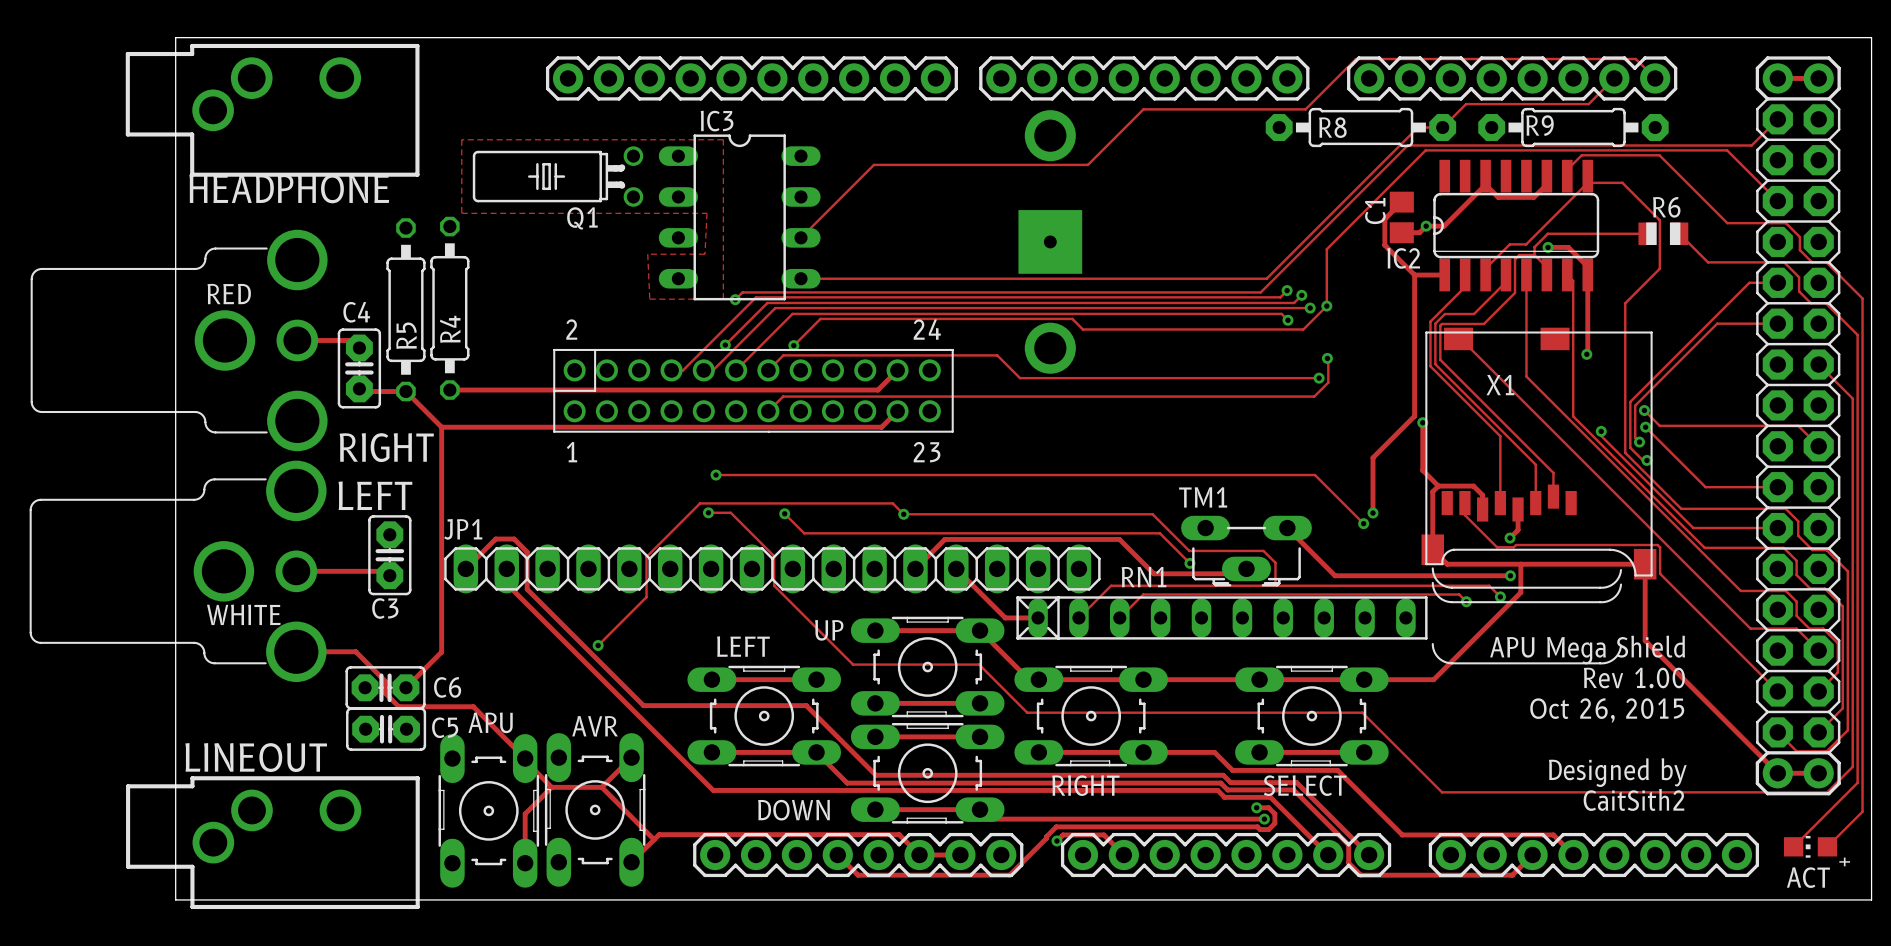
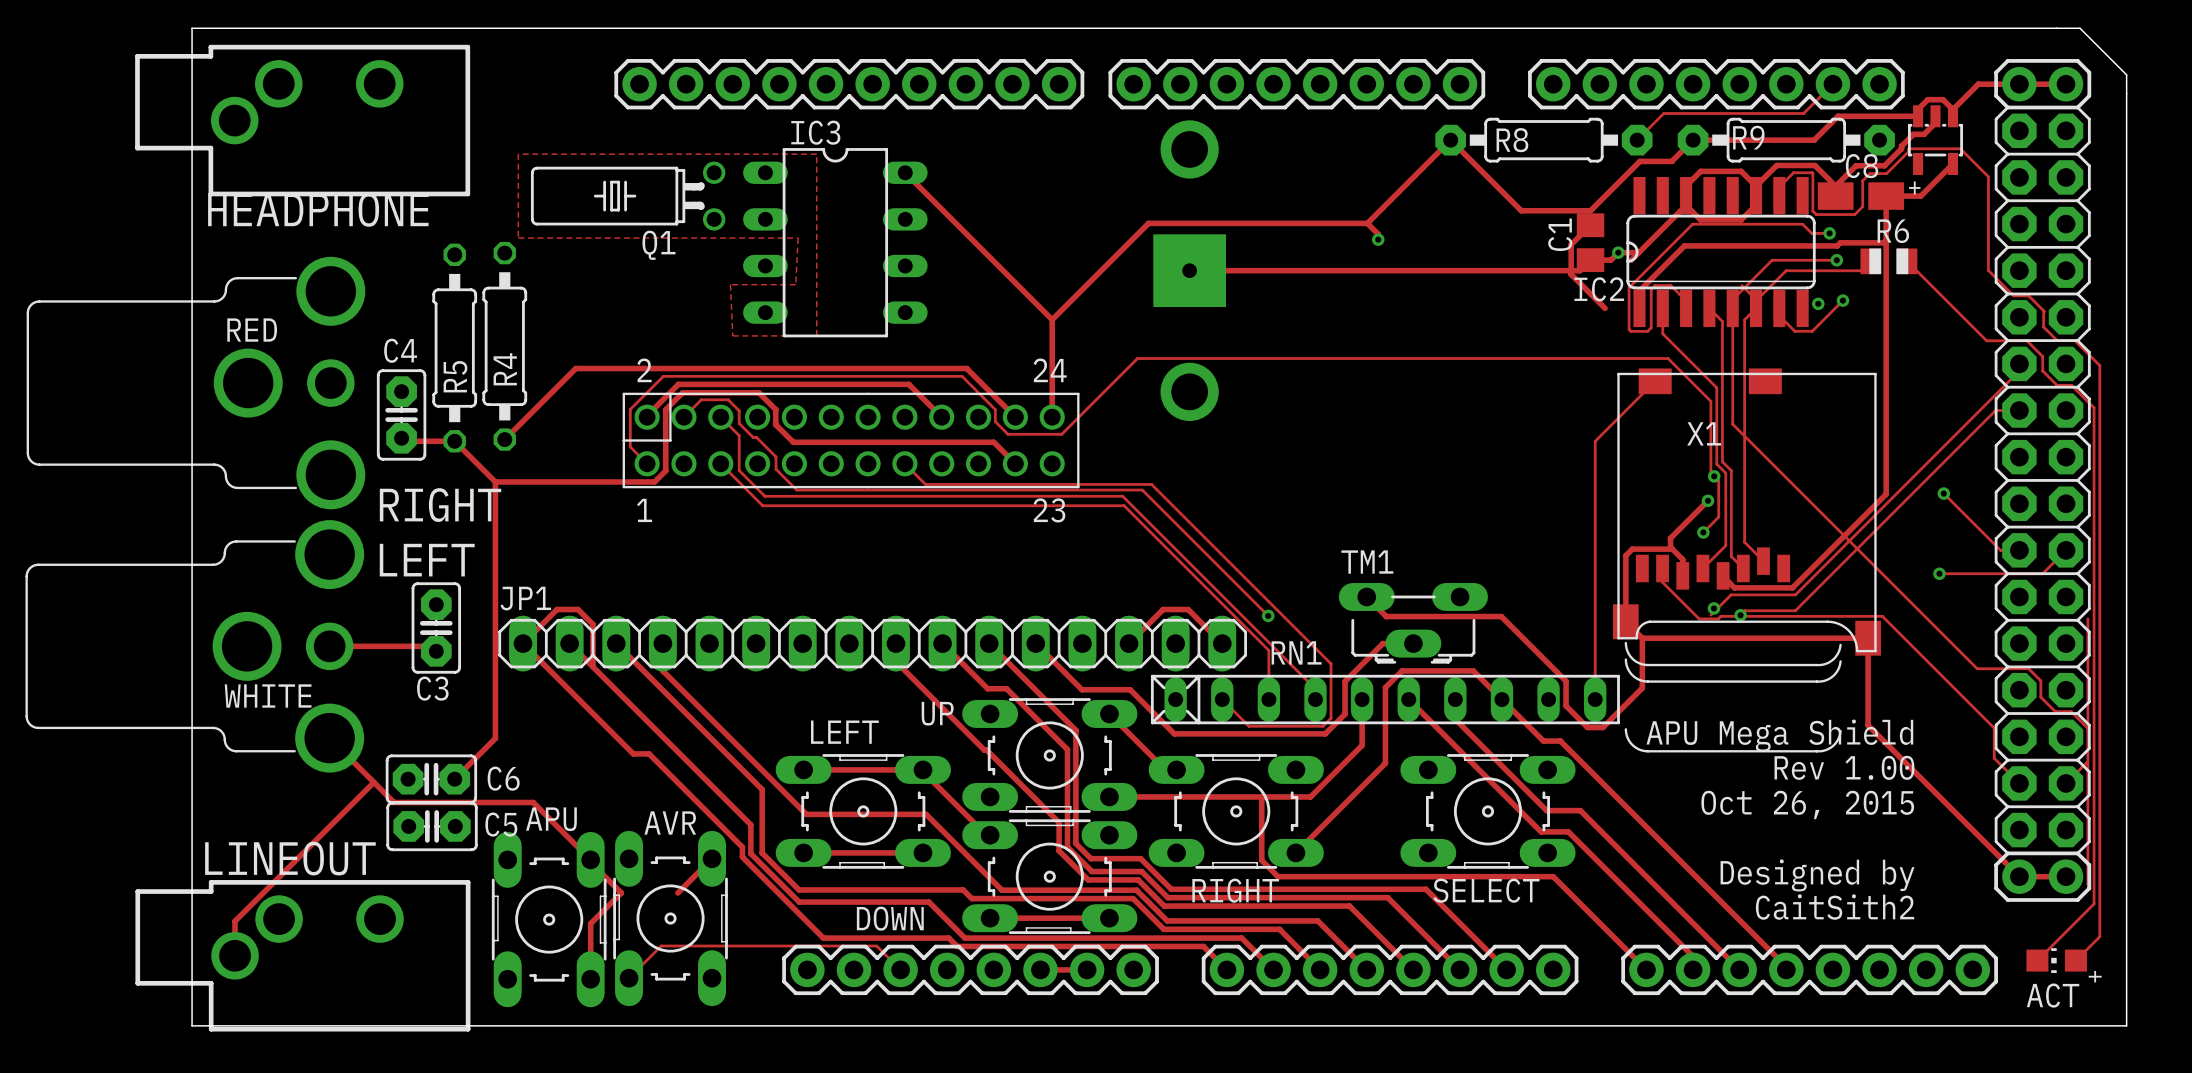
board edge: (175, 37) (1871, 37) (1871, 899) (175, 899) -> (192, 37) (192, 28) (2080, 28) (2126, 74) (2126, 1025) (192, 1025) (192, 1021)
track: (1655, 78) (1635, 59) (1355, 59) (1305, 109) (1143, 109) (1087, 164) (873, 164) (801, 237) -> none
track: none -> (2019, 84) (1978, 84) (1952, 109)
track: none -> (1952, 109) (1942, 99) (1927, 99) (1918, 109) (1918, 116) (1838, 116) (1814, 140) (1693, 140) (1671, 161) (1639, 161) (1590, 210) (1521, 210) (1450, 140) (1367, 223)
track: none -> (1935, 116) (1935, 122) (1924, 134) (1913, 134) (1884, 165) (1856, 165) (1835, 186)
track: (1777, 119) (1751, 145) (1407, 145) (1260, 292) (742, 292) (735, 299) -> none
track: (1442, 127) (1417, 127) (1266, 278) (801, 278) -> none
part: none -> (1935, 140)
track: none -> (1952, 164) (1920, 196) (1886, 196) (1886, 240) (1884, 242)
track: none -> (905, 172) (1052, 319)
track: none -> (1835, 186) (1814, 165) (1776, 165) (1756, 186) (1741, 171) (1700, 171) (1686, 185) (1686, 195)
track: (1567, 169) (1581, 155) (1659, 155) (1727, 223) (1785, 223) (1799, 237) (1799, 250) (1812, 262) (1826, 262) (1862, 298) (1862, 811) (1848, 825) -> none
C8: none -> (1860, 196)
track: none -> (1367, 223) (1148, 223) (1052, 319)
track: none -> (1367, 223) (1378, 234) (1378, 239)
track: (1777, 201) (1727, 150) (1425, 150) (1326, 249) (1326, 306) (1303, 329) (1082, 329) (1072, 318) (820, 318) (793, 345) -> none
via: none -> (1829, 233)
via: none -> (1378, 239)
track: none -> (1590, 260) (1580, 270) (1189, 270)
track: none -> (1836, 260) (1772, 260) (1732, 299) (1732, 308)
via: none -> (1836, 260)
track: (1647, 233) (1547, 233) (1534, 247) (1534, 255) (1519, 255) (1515, 259) (1515, 292) (1483, 323) (1441, 323) (1440, 325) (1440, 359) (1553, 472) (1553, 496) -> (1756, 308) (1744, 319) (1744, 542) (1763, 561)
track: none -> (1870, 261) (1861, 270) (1786, 270) (1756, 300)
track: (1548, 247) (1568, 247) (1587, 266) (1586, 354) -> none
via: (1548, 247) -> none
track: (1708, 262) (1784, 262) (1785, 264) -> (1779, 188) (1793, 172) (1812, 172) (1812, 211) (1816, 214) (1854, 214) (1862, 206) (1862, 180) (1869, 173) (1886, 173) (1908, 151) (1908, 148) (1960, 148) (1988, 176) (1988, 270) (2013, 295) (2028, 295)
track: none -> (1939, 293) (1986, 340) (2026, 340) (2042, 356) (2042, 370) (2057, 385) (2071, 385) (2094, 407) (2094, 903)
track: (1485, 268) (1509, 244) (1526, 244) (1587, 182) (1622, 182) (1659, 220) (1659, 268) (1625, 303) (1625, 452) (1681, 508) (1785, 508) (1798, 521) (1798, 535) (1812, 550) (1826, 550) (1847, 571) (1847, 730) (1826, 751) (1796, 751) (1777, 732) -> (1686, 300) (1670, 285) (1654, 285) (1651, 289) (1651, 327) (1647, 331) (1630, 331) (1629, 329) (1629, 287) (1692, 224) (1802, 224) (1811, 233) (1829, 233)
via: none -> (1842, 300)
via: none -> (1818, 303)
track: (1444, 275) (1414, 275) (1414, 416) (1373, 457) (1373, 513) -> (1639, 308) (1639, 290) (1684, 245) (1837, 245) (1840, 242) (1884, 242)
track: (1506, 275) (1506, 282) (1474, 314) (1444, 314) (1435, 323) (1435, 364) (1535, 464) (1535, 503) -> (1709, 308) (1722, 321) (1722, 461) (1731, 470) (1731, 556) (1743, 568)
track: (1567, 275) (1573, 280) (1573, 416) (1704, 547) (1783, 547) (1796, 560) (1796, 575) (1810, 588) (1824, 588) (1842, 606) (1842, 708) (1818, 732) -> (1779, 308) (1779, 315) (1794, 331) (1812, 331) (1842, 300)
track: (1777, 282) (1749, 282) (1630, 401) (1630, 447) (1642, 460) (1646, 460) -> none
track: none -> (1052, 319) (1052, 417)
track: (1465, 286) (1430, 321) (1430, 366) (1500, 436) (1500, 503) -> (1662, 321) (1662, 333) (1716, 387) (1716, 464) (1725, 473) (1725, 545) (1702, 568)
track: (1287, 290) (1280, 297) (756, 297) (683, 370) (671, 370) -> none
via: (1287, 290) -> none
track: (1301, 295) (1294, 302) (767, 302) (725, 345) -> none
via: (1301, 295) -> none
via: (735, 299) -> none
track: (1825, 303) (1857, 334) (1857, 782) (1843, 797) -> (2074, 340) (2099, 365) (2099, 936)
via: (1326, 306) -> none
track: (1310, 308) (775, 308) (712, 370) (703, 370) -> none
via: (1310, 308) -> none
track: (1287, 320) (1281, 313) (792, 313) (736, 370) -> none
via: (1287, 320) -> none
track: (1777, 323) (1717, 323) (1635, 405) (1635, 437) (1639, 442) -> (2019, 363) (2019, 370) (1795, 594) (1731, 594) (1710, 615)
track: (1458, 338) (1460, 338) (1750, 628) (1796, 628) (1818, 650) -> (1655, 381) (1595, 441) (1595, 699)
track: (297, 340) (351, 340) (359, 348) -> none
via: (725, 345) -> none
via: (793, 345) -> none
via: (1586, 354) -> none
track: (1327, 358) (1328, 382) (1314, 396) (783, 396) (768, 411) -> none
via: (1327, 358) -> none
track: none -> (2019, 410) (1995, 410) (1795, 610) (1745, 610) (1740, 615)
track: (1818, 364) (1852, 398) (1852, 766) (1827, 792) (1442, 792) (1362, 712) (1027, 712) (979, 664) (853, 664) (774, 585) (774, 556) (730, 512) (708, 512) -> none
track: none -> (647, 417) (678, 384) (908, 384) (941, 417)
track: none -> (683, 417) (701, 399) (728, 399) (739, 410) (739, 423) (776, 456) (776, 469) (796, 490) (1142, 490) (1268, 615)
track: none -> (720, 417) (739, 435) (739, 470) (764, 496) (1122, 496) (1315, 689) (1315, 699)
track: (768, 370) (783, 355) (997, 355) (1020, 378) (1319, 378) -> none
track: (897, 370) (877, 390) (449, 390) -> (1015, 417) (966, 368) (575, 368) (504, 439)
via: (1319, 378) -> none
track: (1644, 410) (1659, 425) (1798, 425) (1818, 446) -> none
via: (1644, 410) -> none
track: none -> (647, 463) (630, 447) (630, 409) (663, 376) (962, 376) (995, 409) (995, 421) (1008, 434) (1061, 434) (1137, 358) (1668, 358) (1710, 401) (1710, 473) (1718, 480) (1718, 517) (1703, 532)
track: (897, 411) (881, 427) (581, 427) -> (1015, 463) (993, 442) (793, 442) (775, 424) (775, 409) (758, 392) (682, 392) (665, 409) (665, 470) (654, 481)
track: (1422, 422) (1422, 470) (1438, 486) -> none
via: (1422, 422) -> none
via: none -> (1714, 476)
track: (1645, 427) (1705, 487) (1761, 487) -> (1943, 493) (2000, 550)
via: (1645, 427) -> none
track: (1601, 431) (1601, 435) (1693, 528) (1777, 528) -> none
via: (1601, 431) -> none
via: none -> (1943, 493)
via: (1639, 442) -> none
track: none -> (1707, 500) (1670, 538) (1670, 548)
via: none -> (1707, 500)
via: (1646, 460) -> none
via: none -> (1703, 532)
track: (716, 475) (1315, 475) (1363, 523) -> none
via: (716, 475) -> none
track: none -> (2066, 550) (2042, 573) (1939, 573)
via: none -> (1939, 573)
track: (1518, 510) (1518, 530) (1510, 538) -> (1723, 576) (1734, 587) (1792, 587) (1886, 494) (1886, 244) (1884, 242)
via: (708, 512) -> none
track: (784, 513) (804, 533) (1159, 533) (1189, 563) -> none
via: (784, 513) -> none
via: (1373, 513) -> none
via: (903, 514) -> none
via: (1363, 523) -> none
track: none -> (1366, 596) (1386, 616) (1501, 616) (1566, 681) (1566, 705) (1587, 727) (1602, 727) (1642, 688) (1642, 638)
track: (1287, 528) (1335, 575) (1510, 575) -> none
via: none -> (1740, 615)
track: (1660, 547) (1660, 573) (1755, 669) -> (1885, 619) (1994, 728) (1994, 758)
via position: (1189, 563) -> (1268, 615)
track: (1520, 564) (1520, 592) (1433, 679) (1038, 679) -> none
track: none -> (523, 643) (633, 753) (649, 753) (742, 847) (742, 857) (823, 938) (948, 938) (957, 946) (1203, 946) (1226, 969)
track: (506, 568) (506, 583) (675, 752) -> (616, 643) (762, 789) (762, 853)
track: none -> (895, 643) (895, 661) (1059, 822) (1059, 850) (1088, 879) (1138, 879) (1164, 906) (1349, 906) (1413, 969)
track: none -> (942, 643) (987, 688) (1006, 688) (1067, 749) (1067, 847) (1091, 871) (1141, 871) (1167, 897) (1387, 897) (1460, 969)
track: none -> (989, 643) (1075, 730) (1075, 843) (1090, 858) (1140, 858) (1171, 889) (1425, 889) (1440, 904)
track: (915, 568) (944, 539) (1119, 539) (1153, 573) (1241, 573) (1246, 568) -> (1035, 643) (1081, 689) (1130, 689) (1174, 733) (1325, 733) (1345, 714) (1345, 681) (1382, 643) (1413, 643)
track: (956, 568) (1005, 617) (1038, 617) -> none
track: none -> (1129, 643) (1163, 609) (1188, 609) (1222, 643)
via: (1510, 575) -> none
track: (1275, 585) (1275, 562) (1263, 550) (1189, 550) (1152, 514) (903, 514) (892, 503) (700, 503) (646, 556) (646, 597) (598, 645) -> none
track: (1500, 596) (1489, 585) (1111, 585) (1078, 617) -> (904, 463) (925, 484) (1151, 484) (1331, 663) (1331, 718) (1323, 726) (1249, 726) (1222, 699)
via: (1500, 596) -> none
track: (1466, 601) (1459, 594) (1143, 594) (1119, 617) -> (720, 463) (762, 505) (1124, 505) (1268, 650) (1268, 699)
via: (1466, 601) -> none
track: none -> (1408, 699) (1541, 831) (1568, 831) (1693, 956) (1693, 969)
track: (875, 630) (980, 630) -> none
via: (598, 645) -> none
track: (296, 651) (355, 651) (385, 681) (385, 693) (398, 706) (474, 708) -> (329, 738) (394, 802) (533, 802)
track: none -> (373, 782) (235, 921) (235, 955)
track: (875, 703) (980, 703) -> (1362, 699) (1362, 745) (1310, 796) (1109, 796)
track: none -> (1261, 796) (1261, 860) (1278, 876) (1553, 876) (1646, 969)
track: (643, 705) (806, 705) (819, 718) -> (662, 643) (662, 670) (806, 814) (926, 814)
track: (875, 736) (980, 736) -> (990, 835) (986, 835) (923, 769)
track: (816, 752) (847, 783) (1220, 783) (1227, 789) (1293, 789) (1348, 844) (1348, 863) (1360, 875) (1512, 875) (1532, 855) -> (1455, 699) (1455, 719) (1546, 810) (1580, 810) (1739, 969)
track: (1038, 752) (1214, 752) (1232, 770) (1337, 770) (1402, 834) (1553, 834) (1573, 855) -> (1295, 852) (1385, 763) (1385, 687) (1402, 670) (1473, 670) (1543, 741) (1560, 741) (1786, 966) (1786, 969)
track: (1259, 752) (1364, 752) -> none
track: (875, 775) (1223, 775) (1230, 782) (1296, 782) (1369, 855) -> (990, 878) (1001, 890) (1136, 890) (1167, 920) (1317, 920) (1366, 969)
track: (707, 784) (713, 790) (1217, 790) (1224, 797) (1270, 797) -> (799, 889) (963, 889) (971, 898) (1133, 898) (1163, 929) (1279, 929) (1320, 969)
track: (1256, 807) (1268, 807) (1274, 813) (1274, 823) (1268, 829) (1260, 829) (1257, 826) (1056, 826) (1009, 875) (857, 875) (837, 855) -> none
via: (1256, 807) -> none
track: (980, 809) (989, 819) (1264, 819) -> none
track: (525, 814) (551, 787) (601, 787) (654, 839) -> (590, 923) (621, 892)
via: (1264, 819) -> none
track: (1103, 834) (1063, 834) (1056, 841) -> (1250, 947) (1241, 938) (964, 938) (928, 902) (799, 902) (750, 853) (750, 824) (725, 799)
via: (1056, 841) -> none
track: none -> (900, 969) (876, 946) (661, 946) (629, 978)
track: (919, 855) (899, 834) (659, 834) (631, 862) -> none

